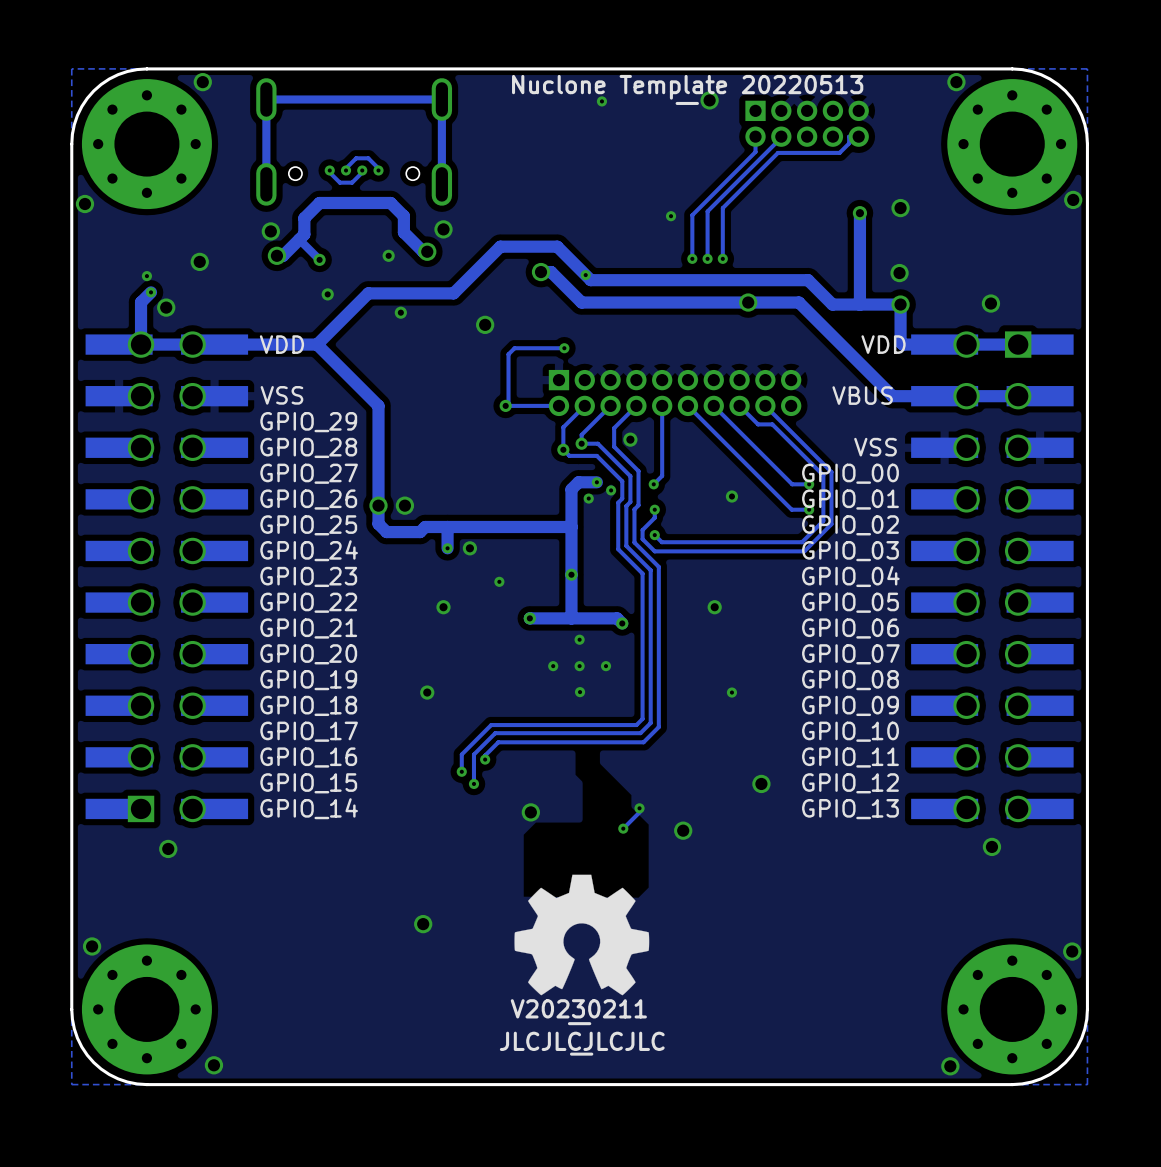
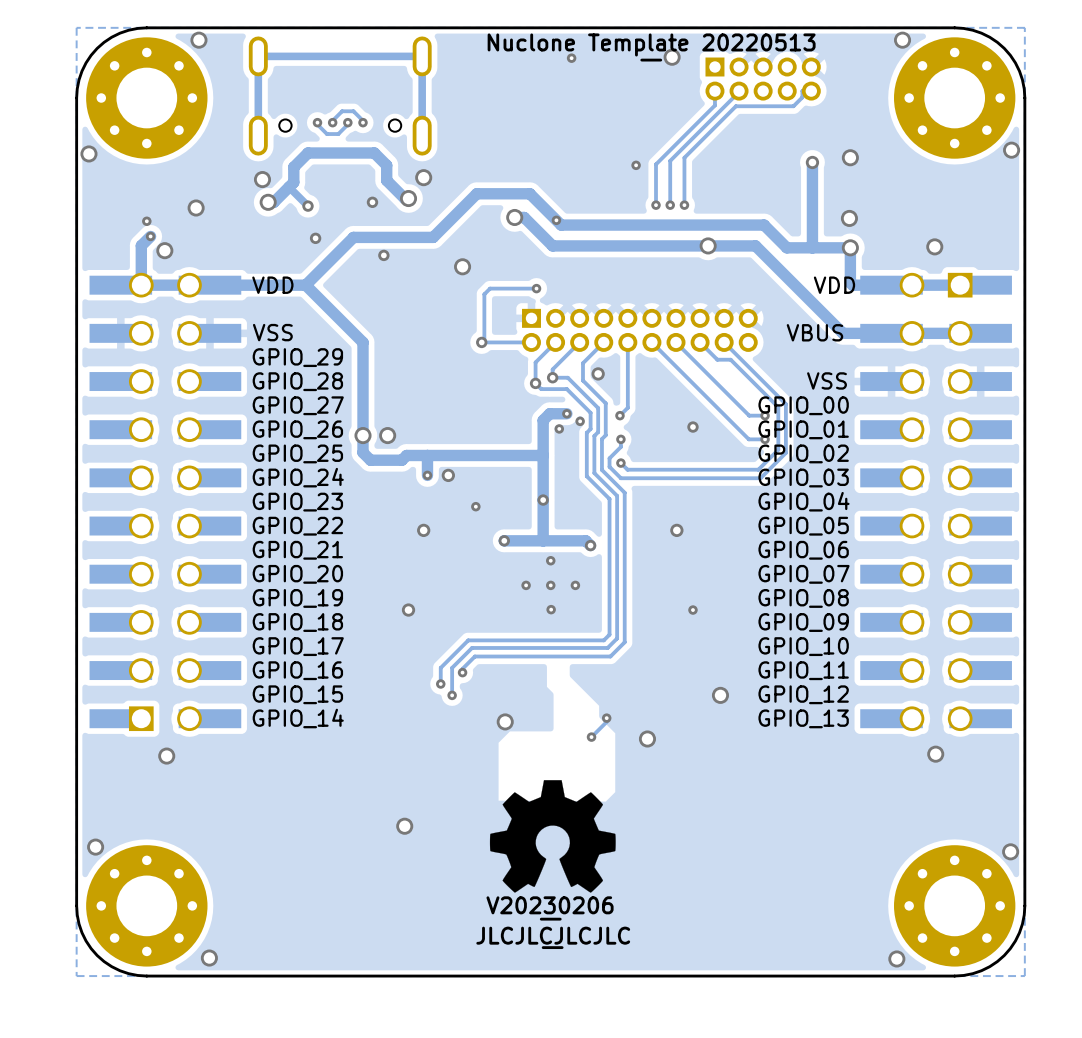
drawing shape: [510, 999, 647, 1026] -> [486, 896, 614, 921]

